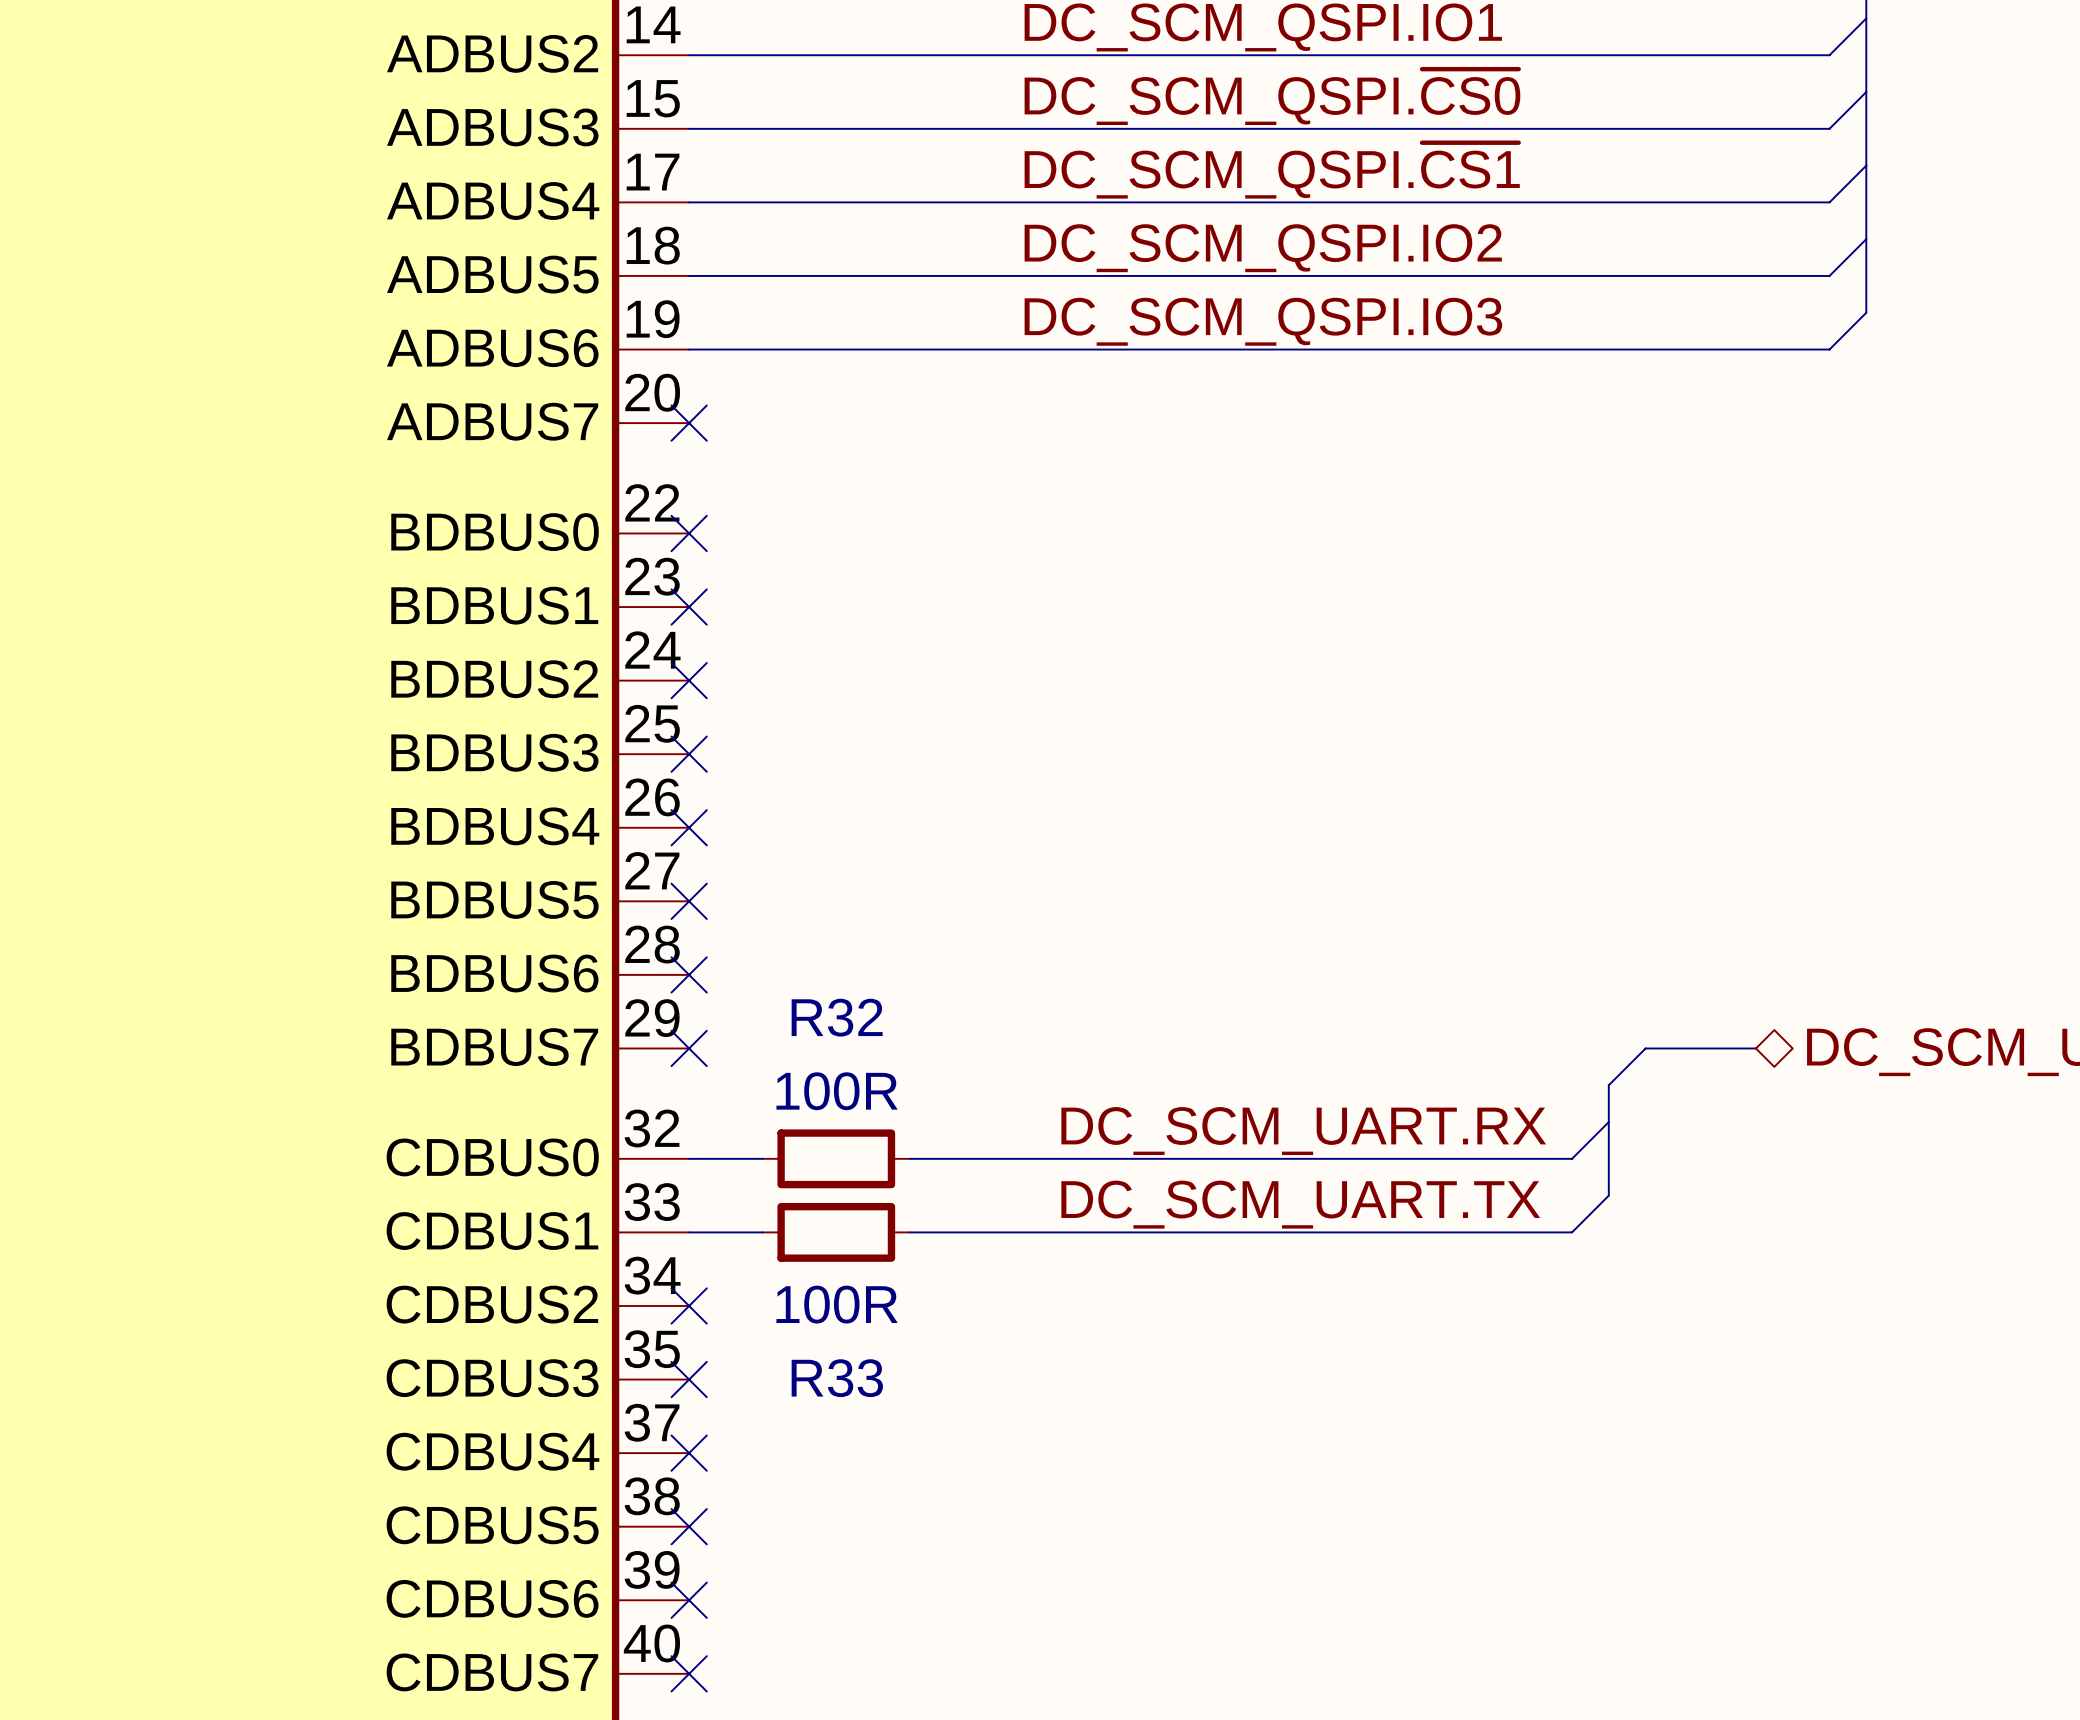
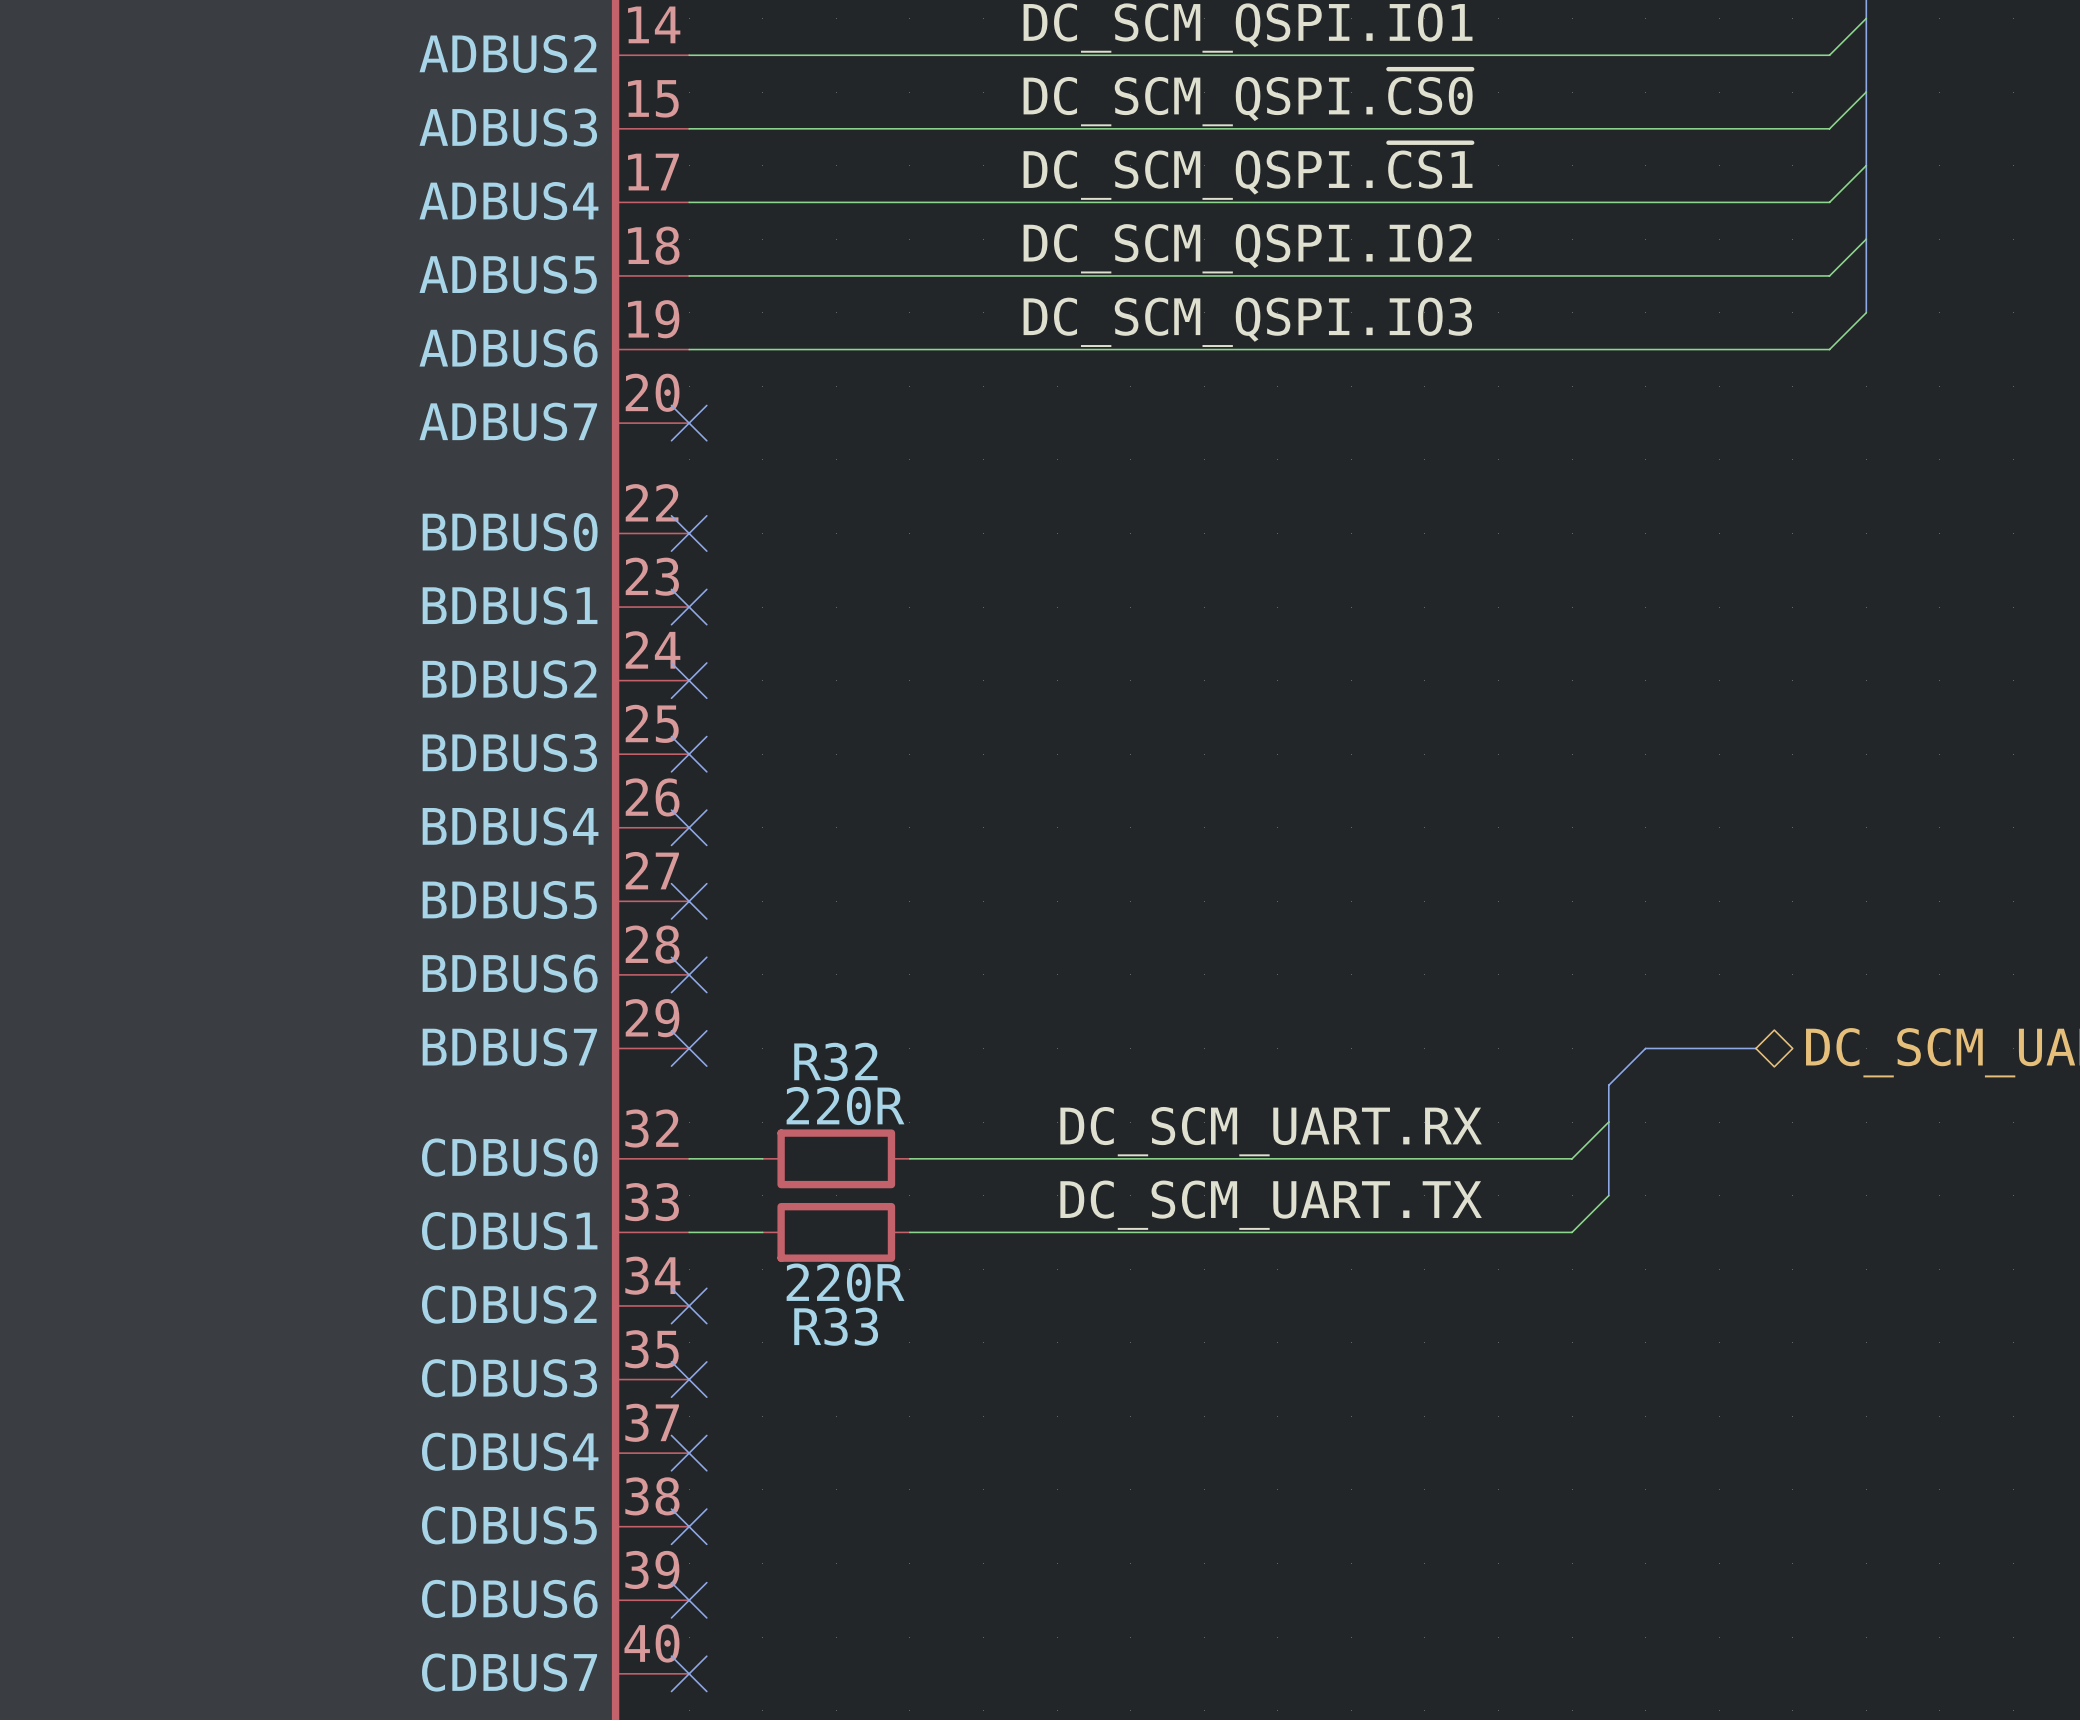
R32 name position: R32 (837, 1017) -> R32 (835, 1061)
R32 text: 100R (837, 1091) -> 220R (845, 1105)
R33 text: 100R (837, 1304) -> 220R (845, 1282)
R33 name position: R33 (837, 1378) -> R33 (836, 1326)

